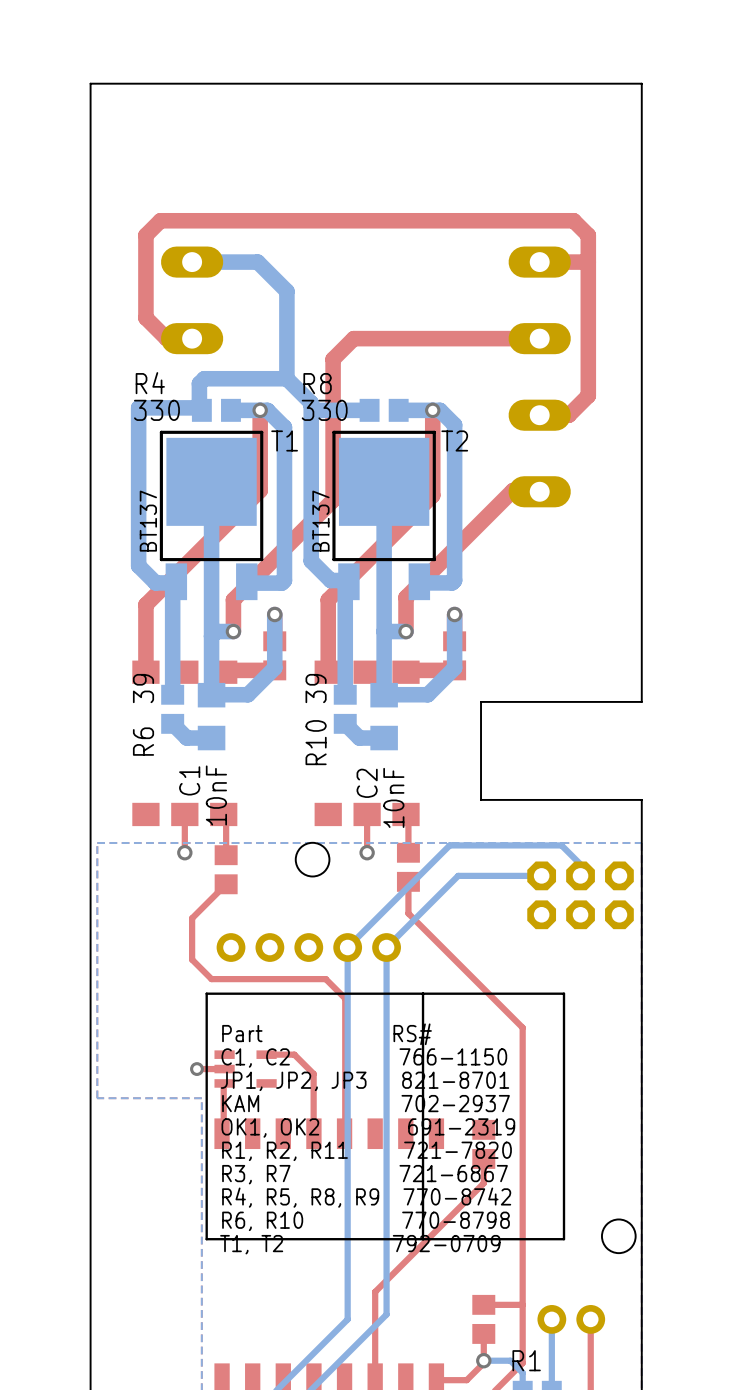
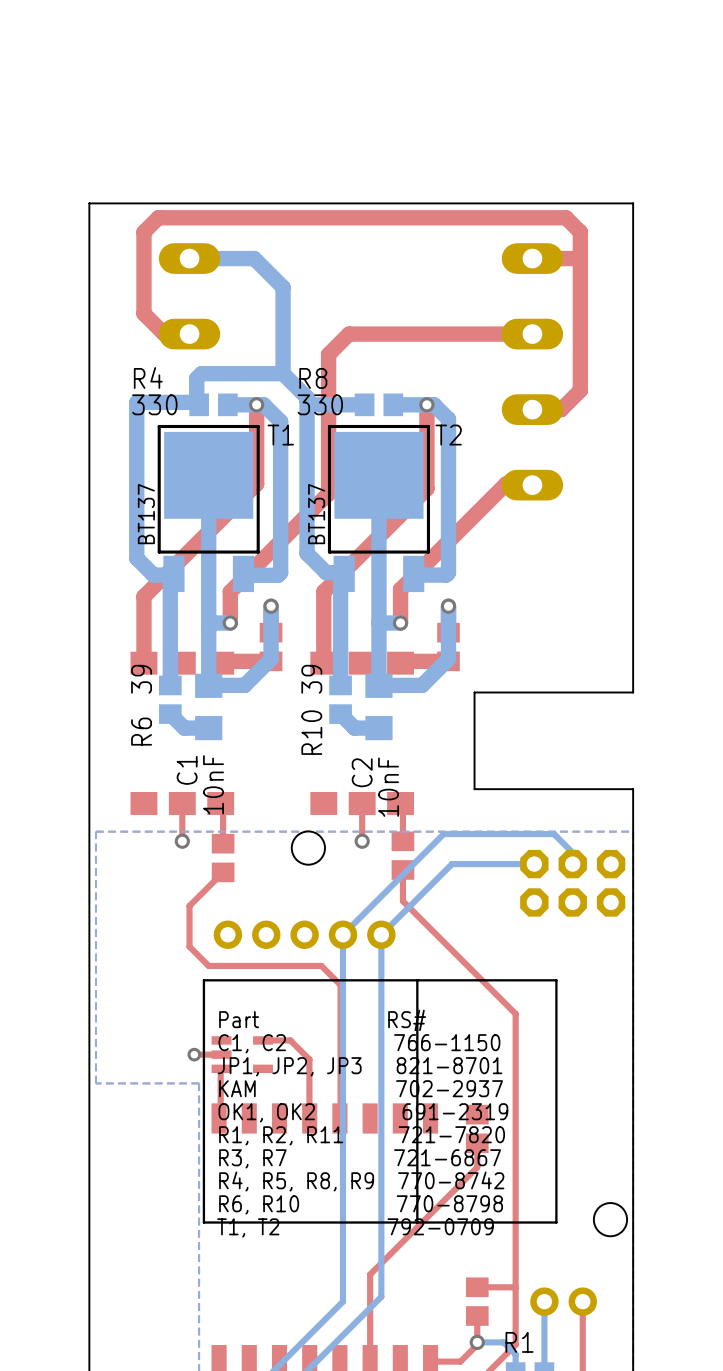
board edge: (641, 206) (641, 83) (90, 83) (90, 206) -> (633, 203) (89, 203)

